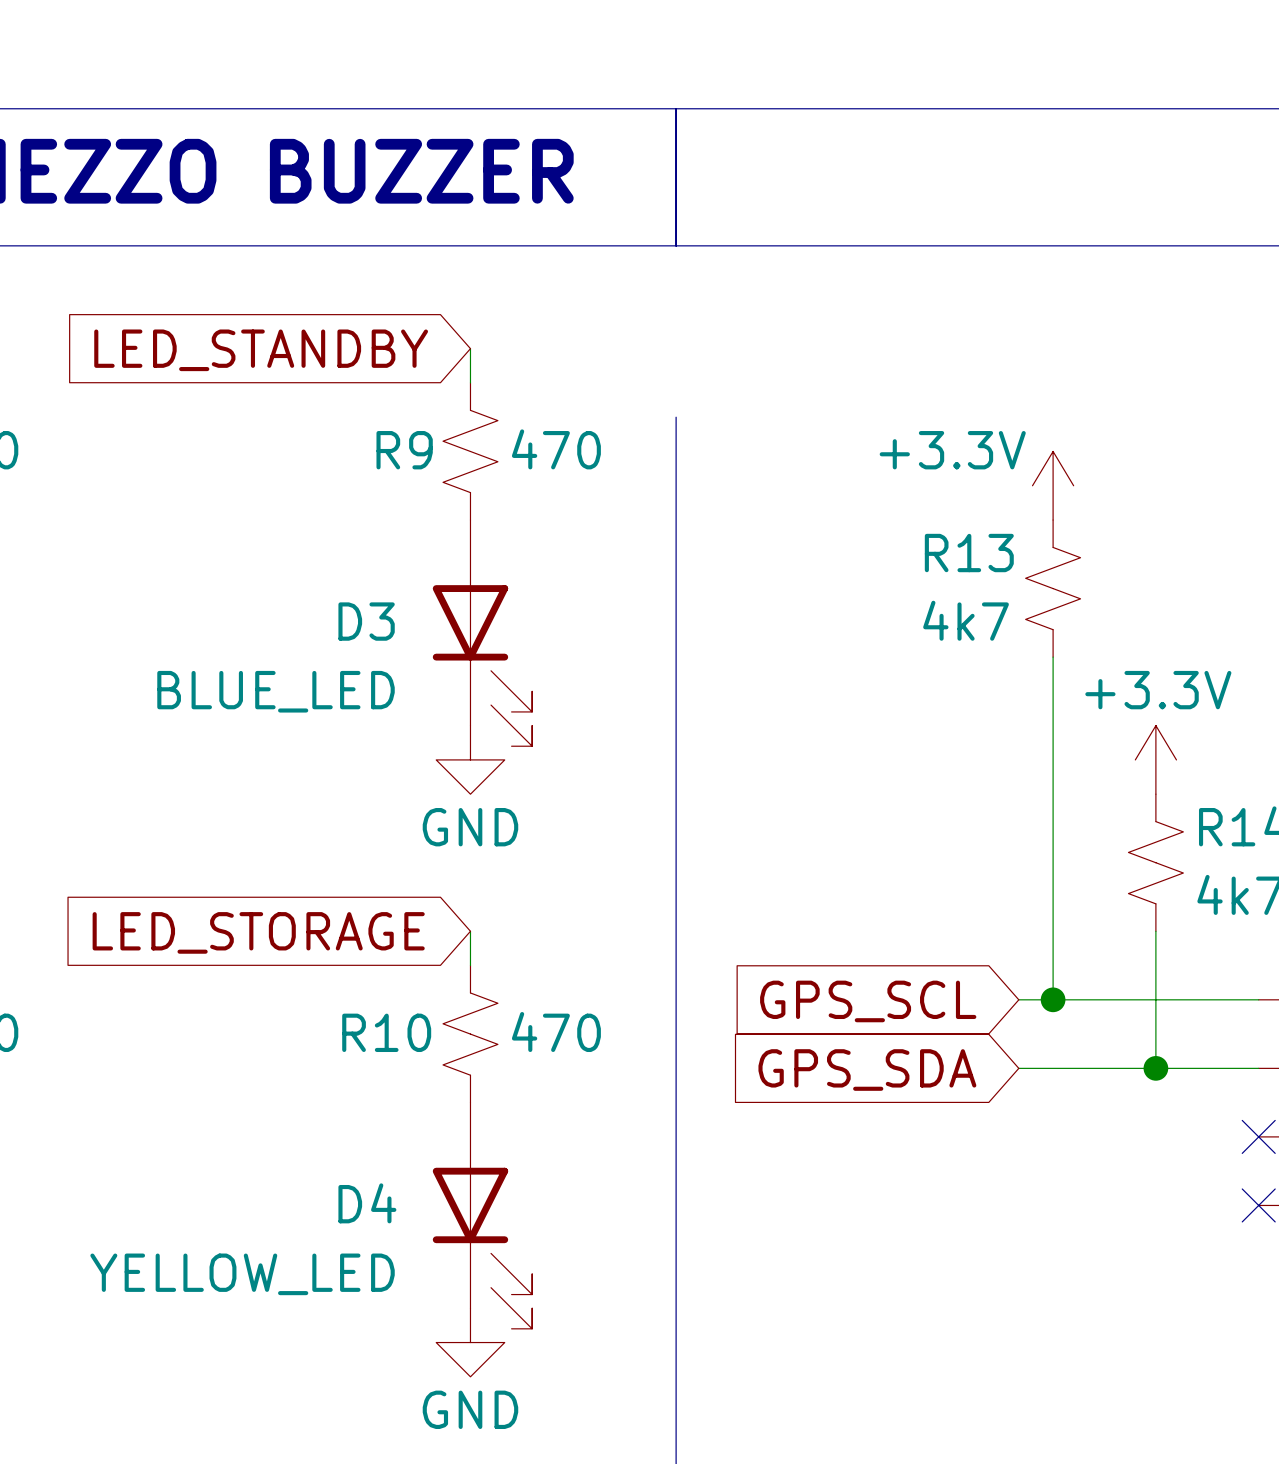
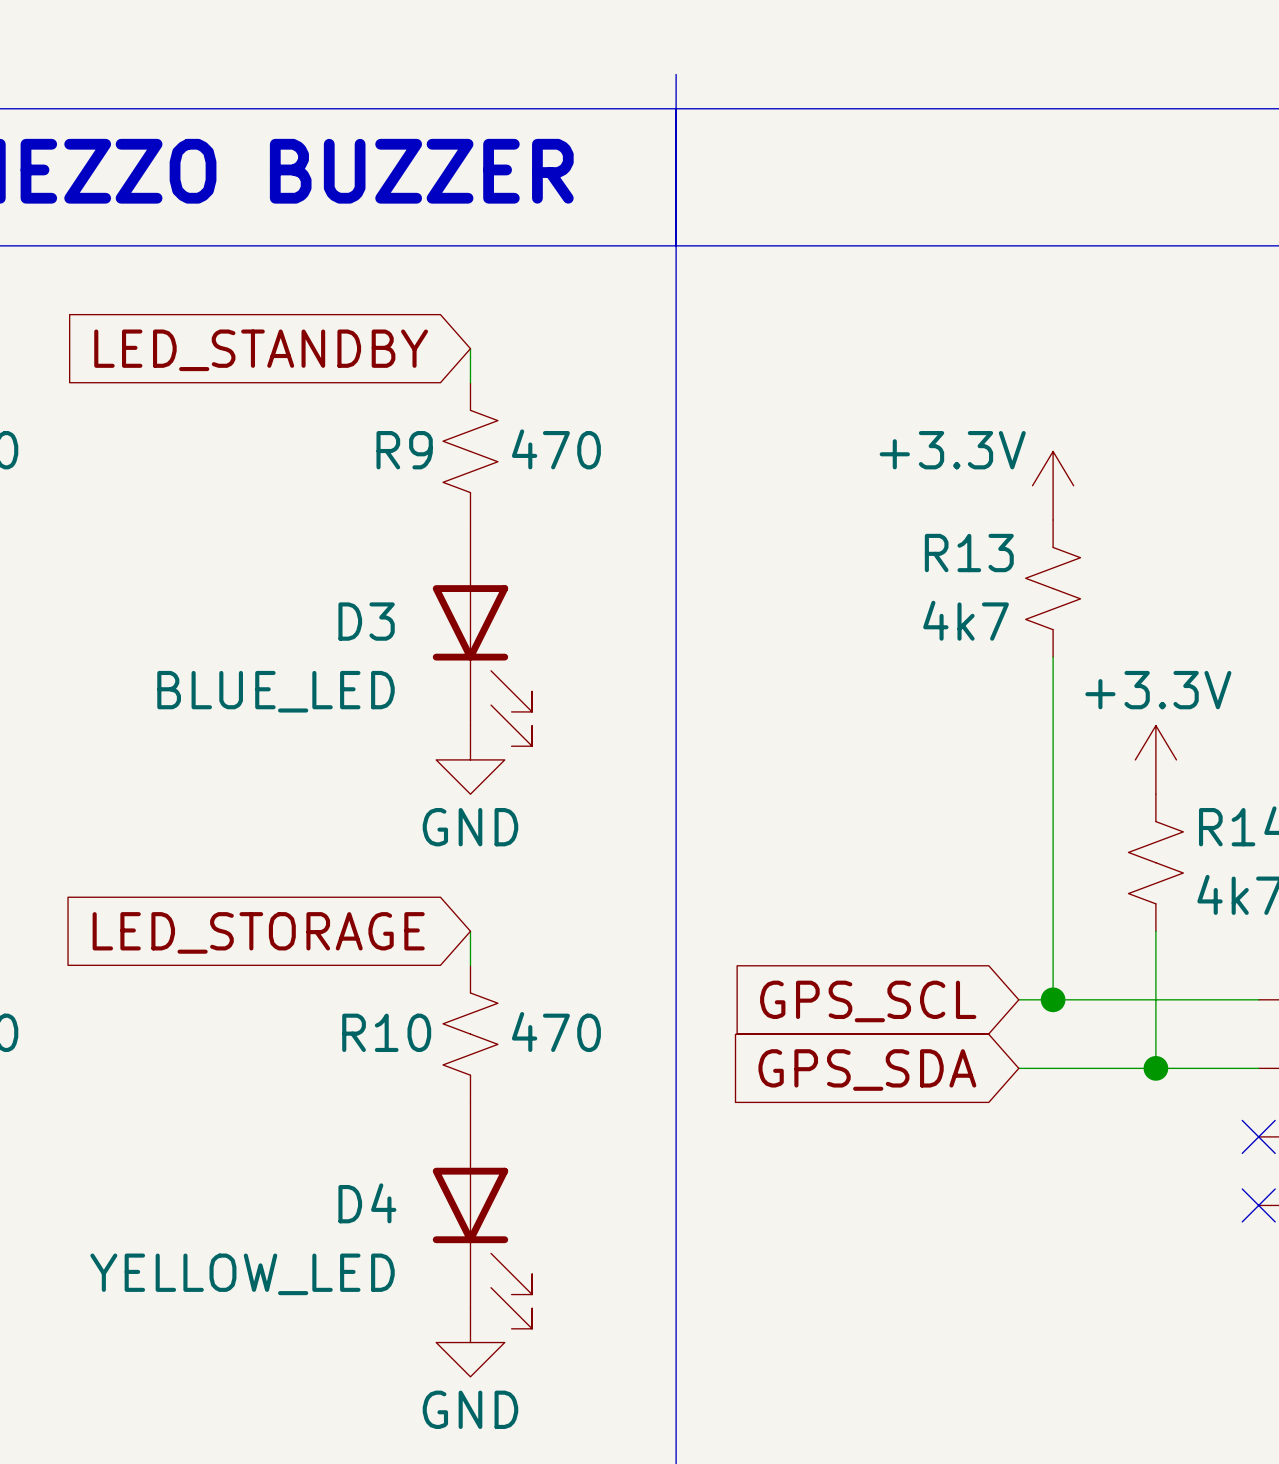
line: none -> (676, 74) (676, 108)
line: none -> (676, 245) (676, 417)

